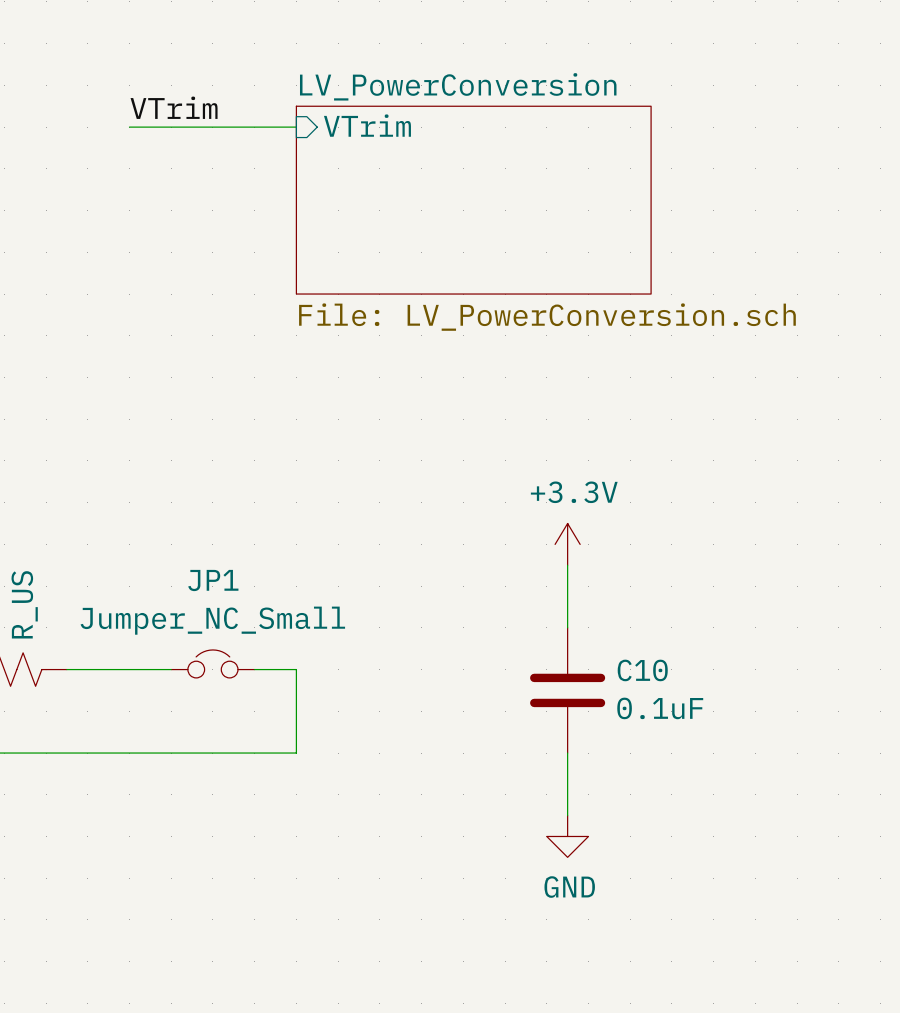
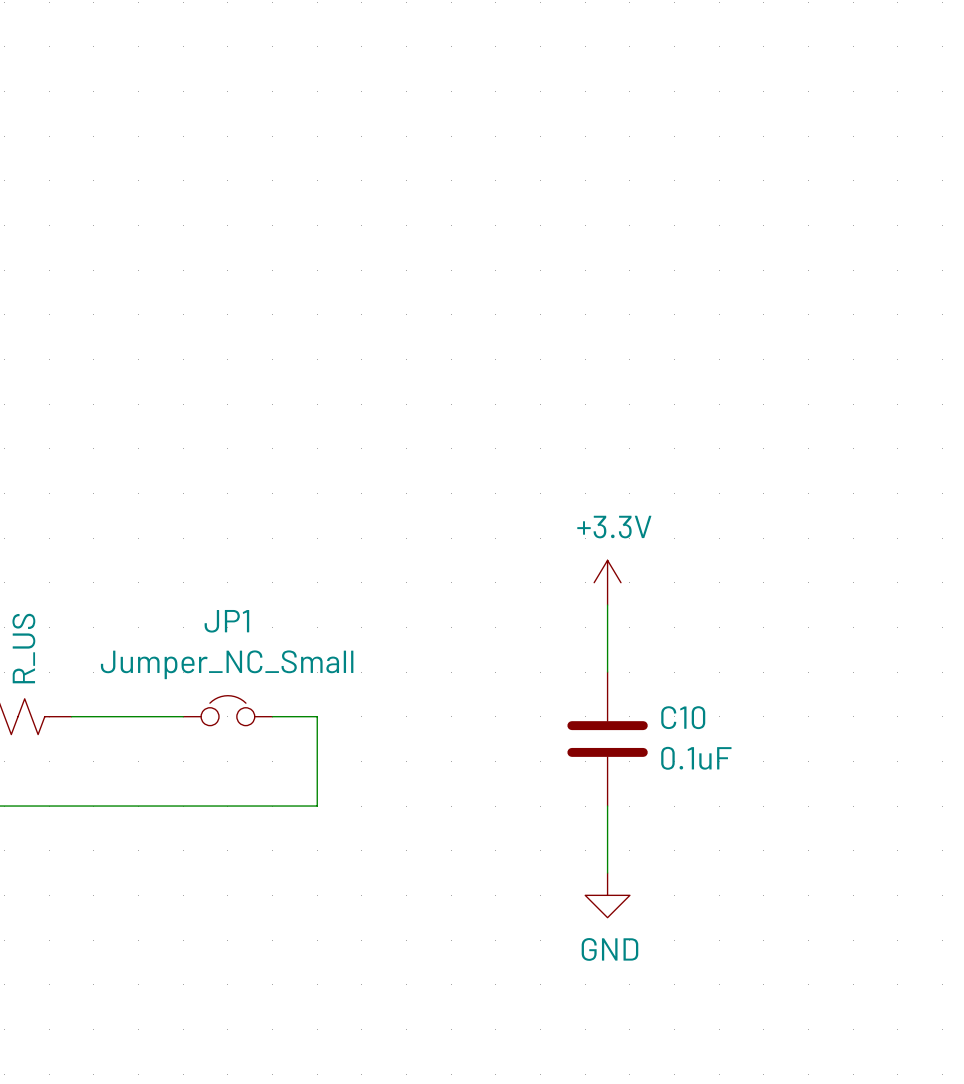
label: VTrim (174, 107) -> none
sheet pin: VTrim (367, 125) -> none
wire: (129, 127) (296, 127) -> none
sheet LV_PowerConversion: File: LV_PowerConversion.sch (473, 200) -> none

